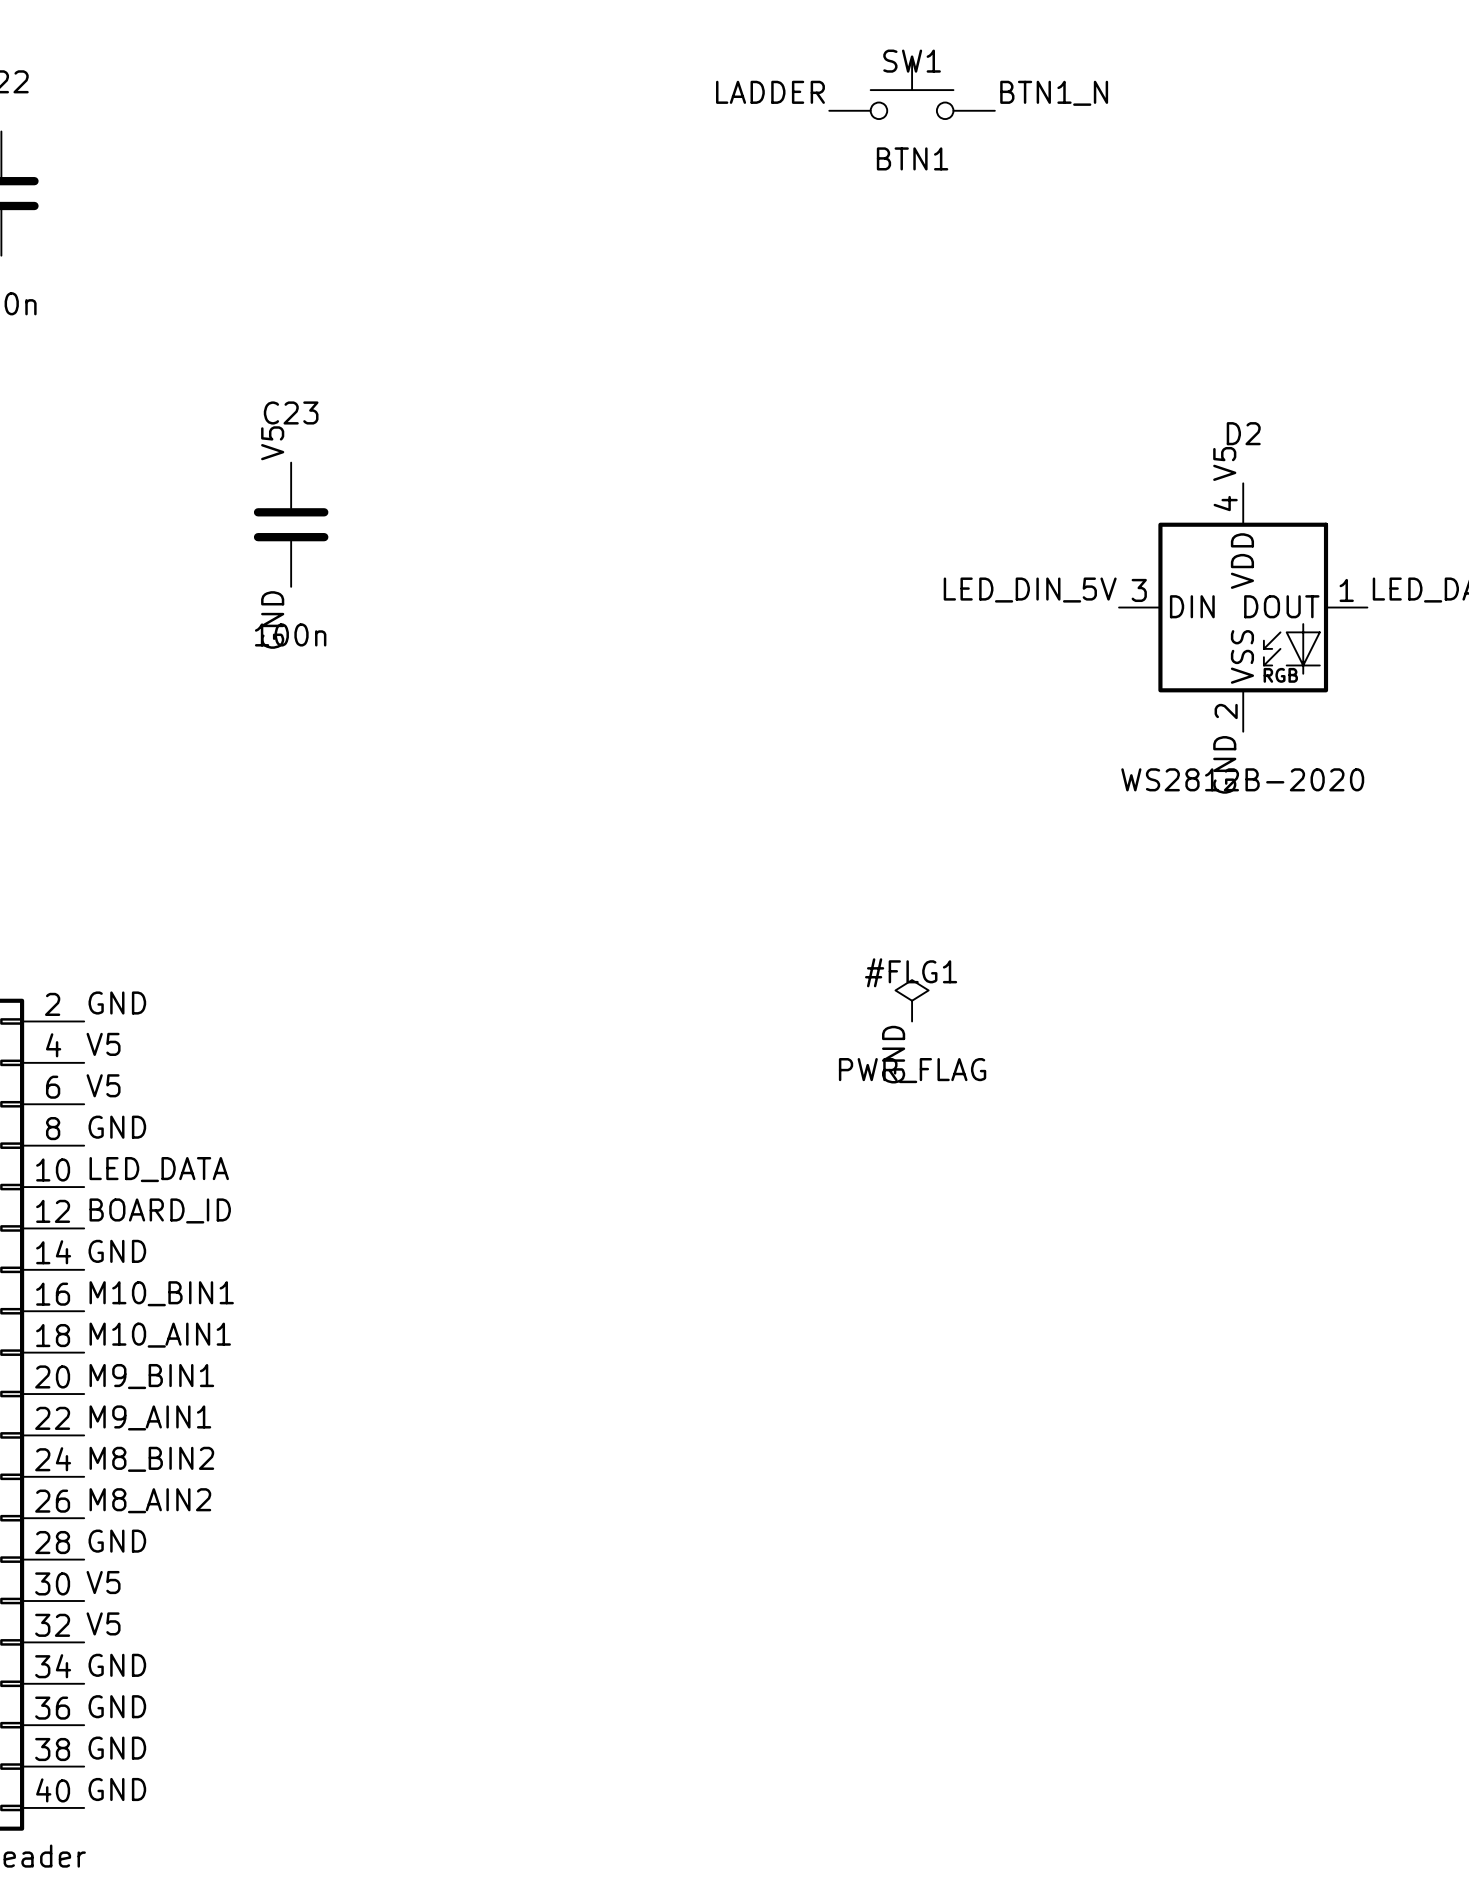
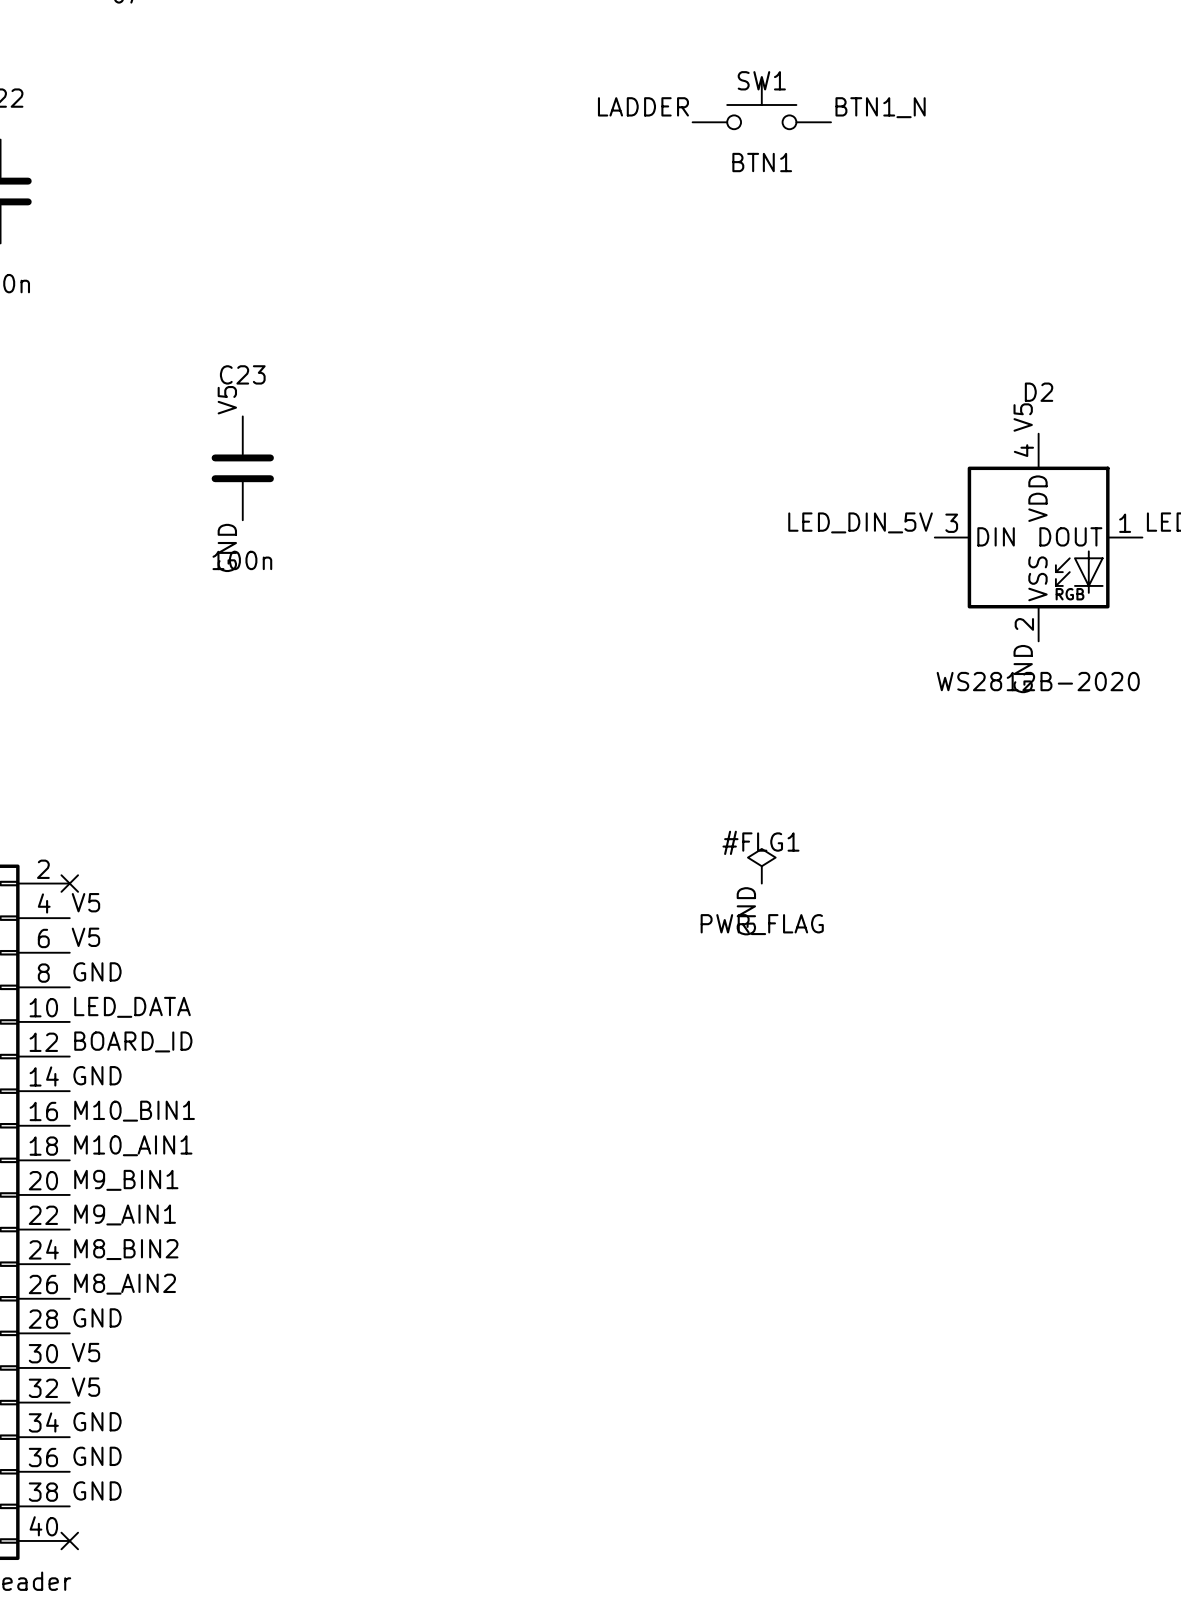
label: GND (117, 1003) -> none
no-connect mark: none -> (69, 883)
label: GND (117, 1789) -> none
no-connect mark: none -> (69, 1540)

